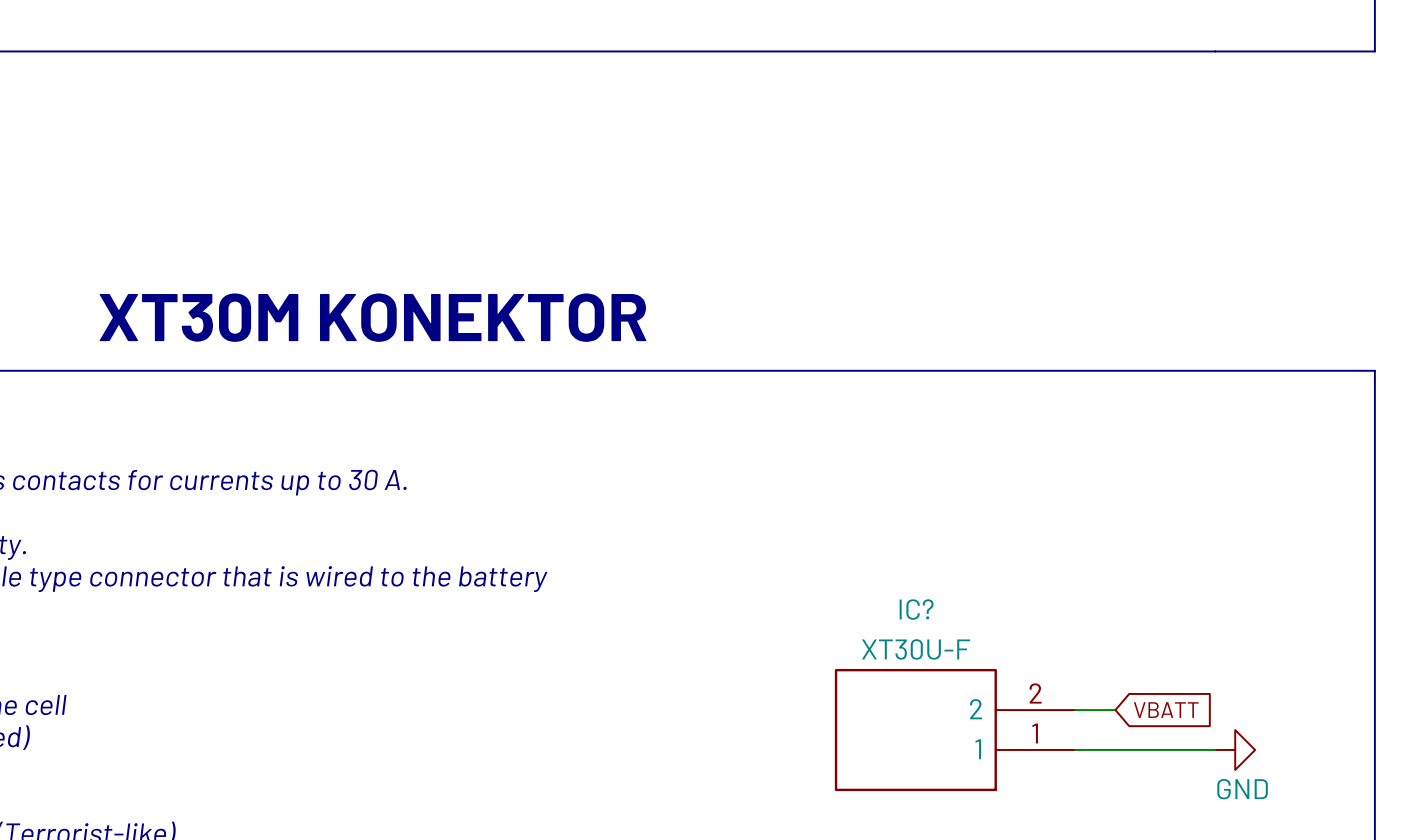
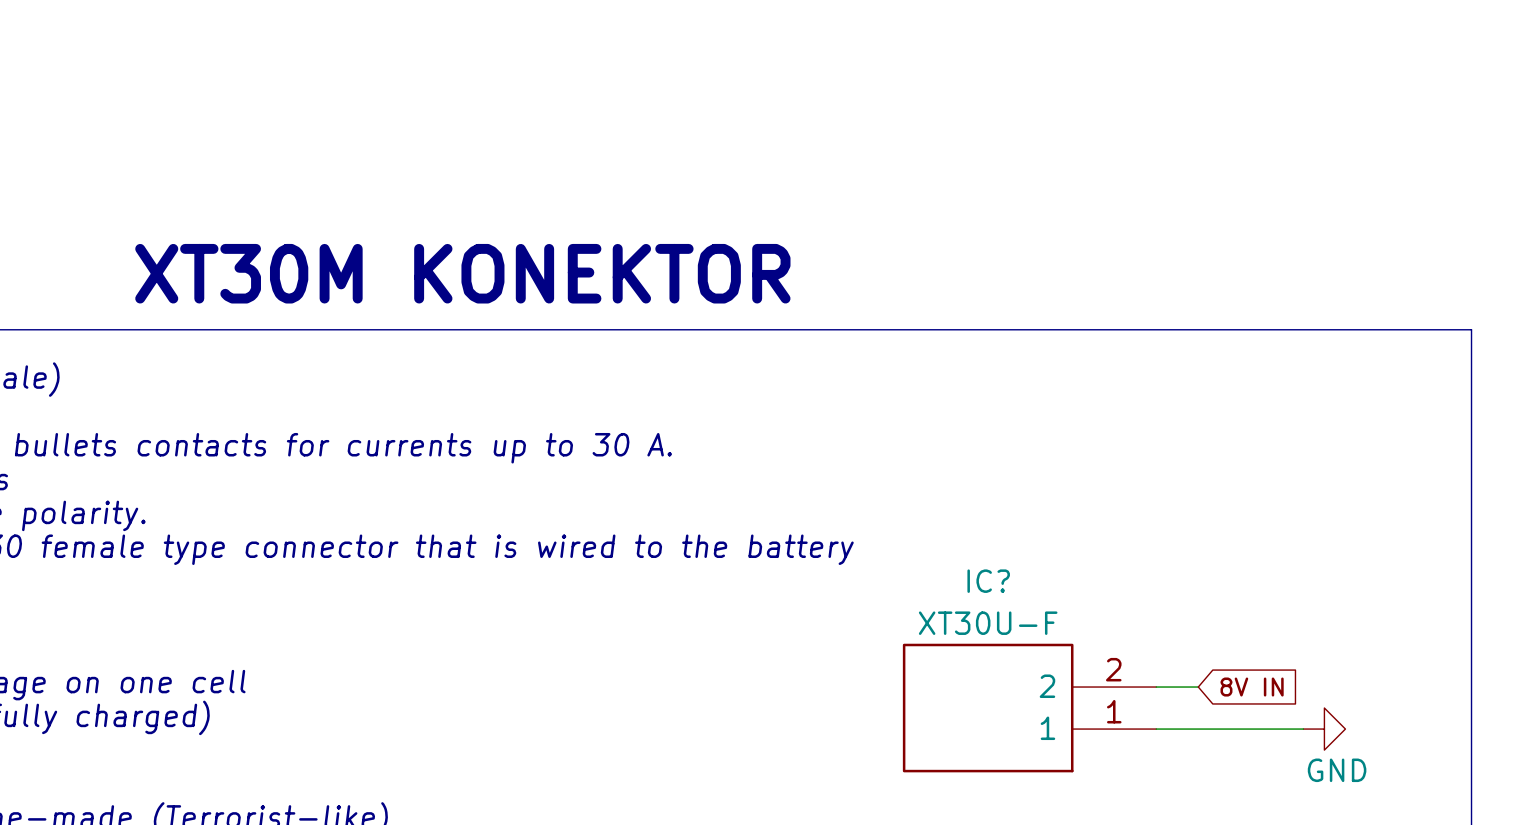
global label: VBATT (1166, 710) -> 8V IN (1252, 687)

